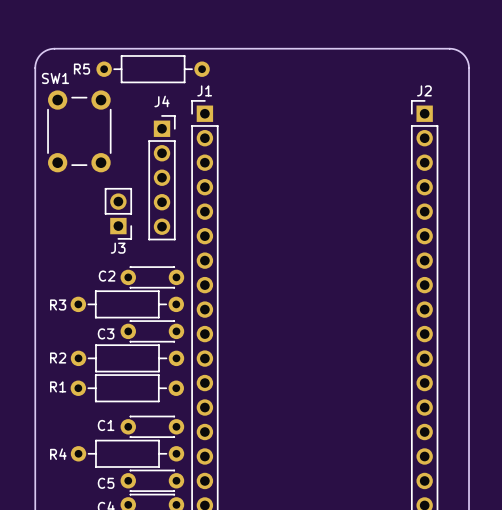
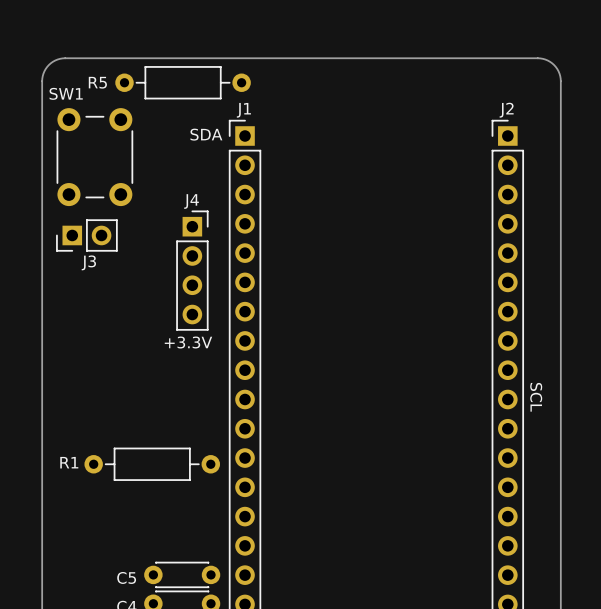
text: none -> SDA (206, 134)
J4 footprint: [148, 115, 176, 241] -> [176, 210, 209, 331]
J3 rotation: 0° (118, 213) -> 90° clockwise (86, 235)
J3 position: (118, 213) -> (86, 235)
C2: (152, 277) -> none
text: none -> +3.3V (188, 342)
R3: (127, 304) -> none
C3: (152, 331) -> none
text: none -> SCL (536, 397)
R2: (127, 358) -> none
C1: (152, 426) -> none
R4: (127, 453) -> none

